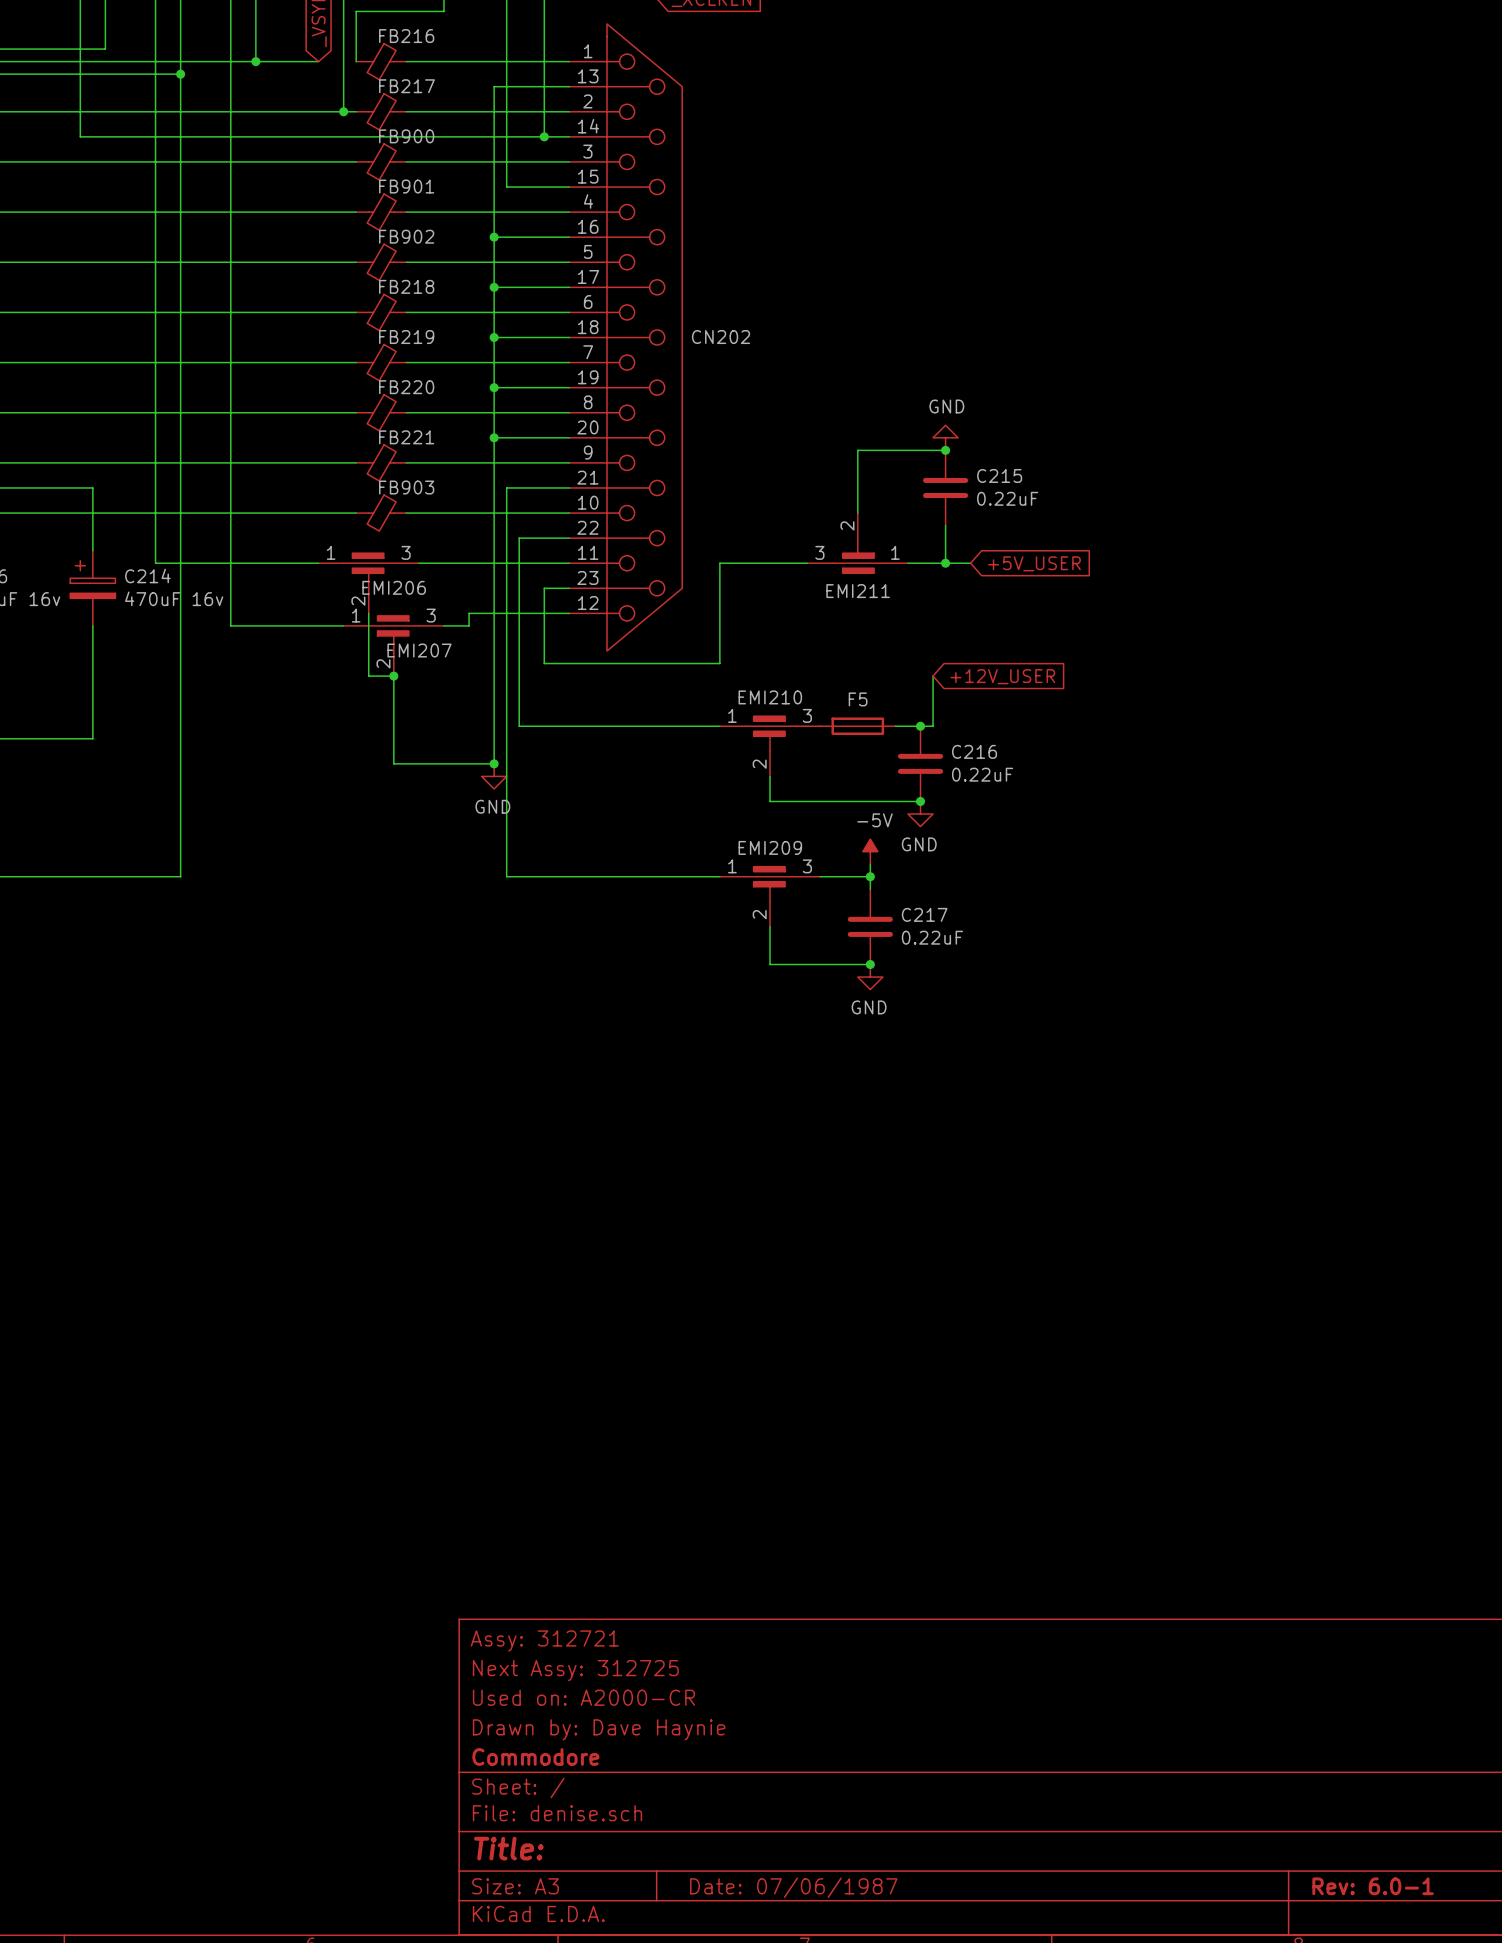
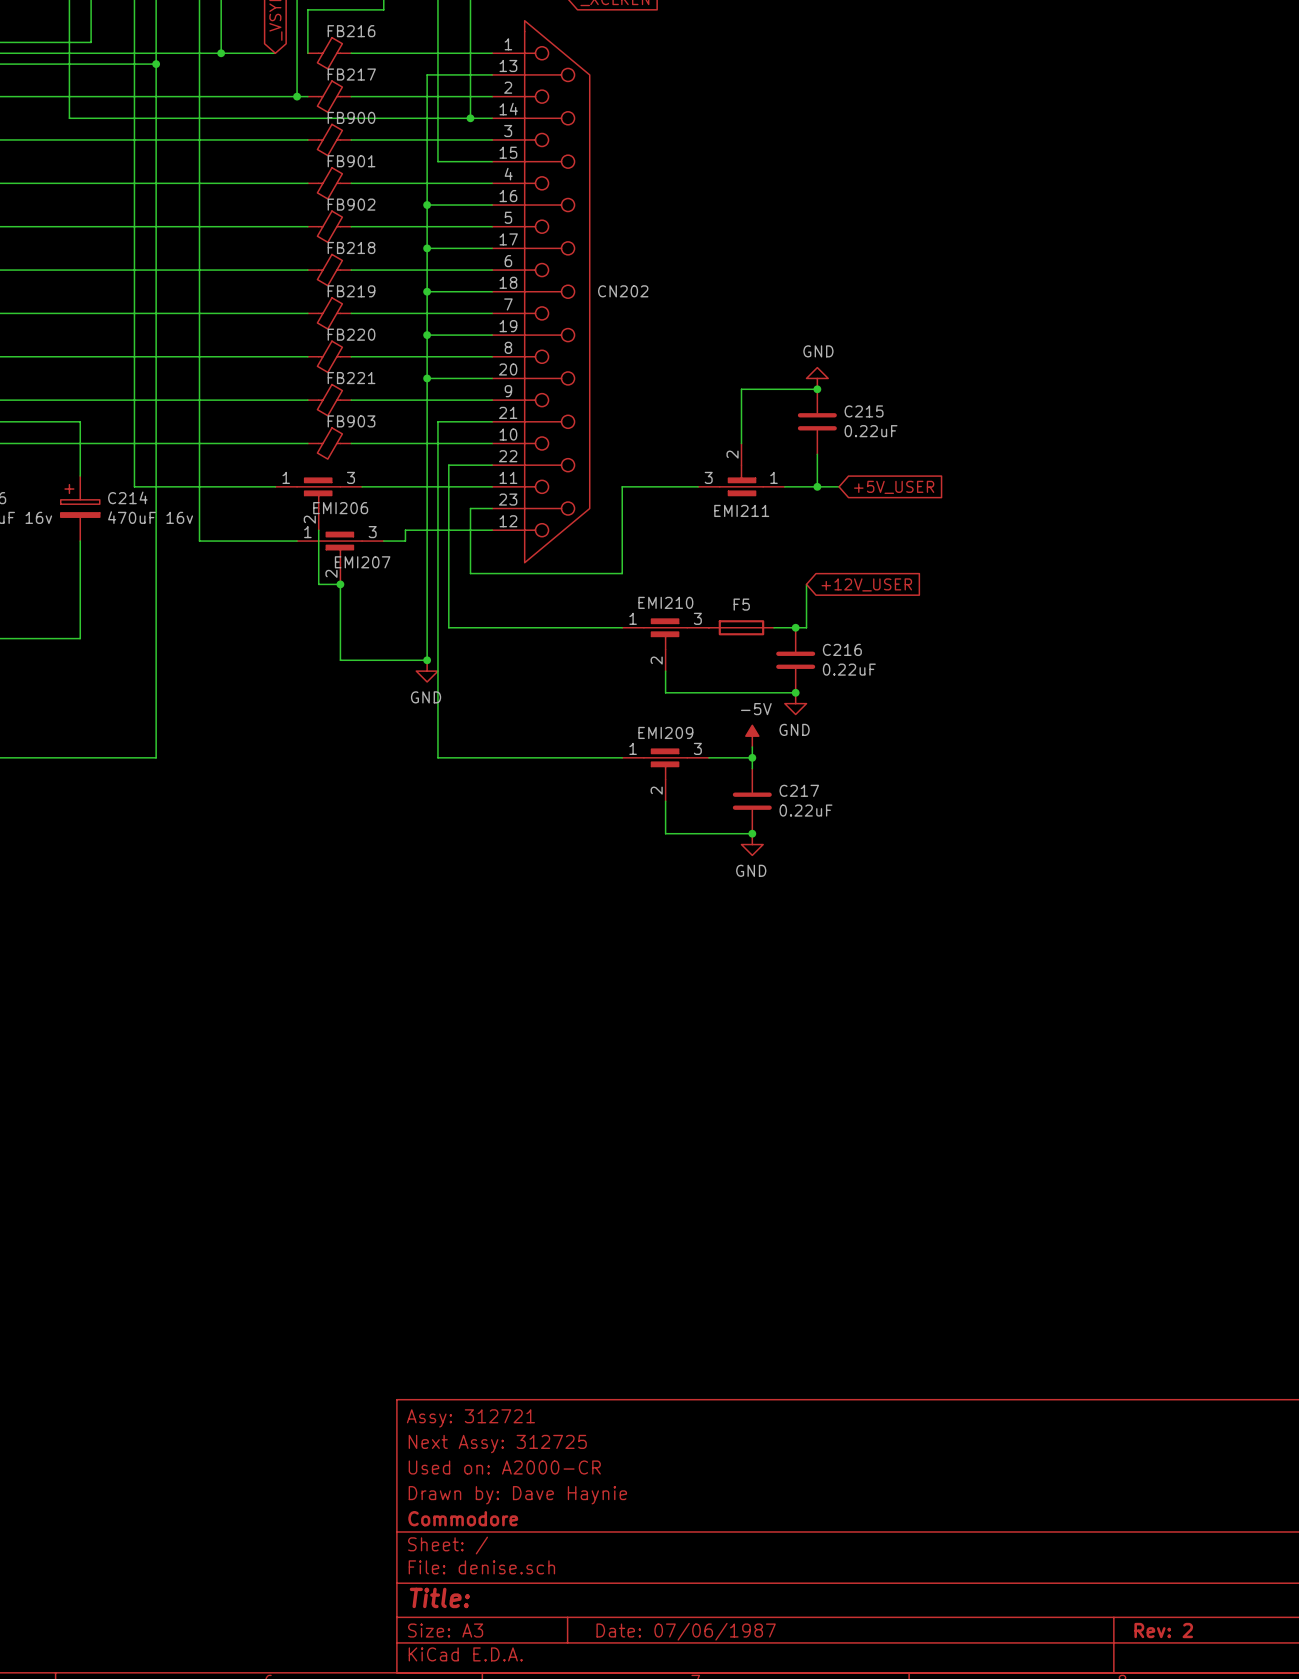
title block: Rev: 6.0-1 (1373, 1886) -> Rev: 2 (1163, 1630)

